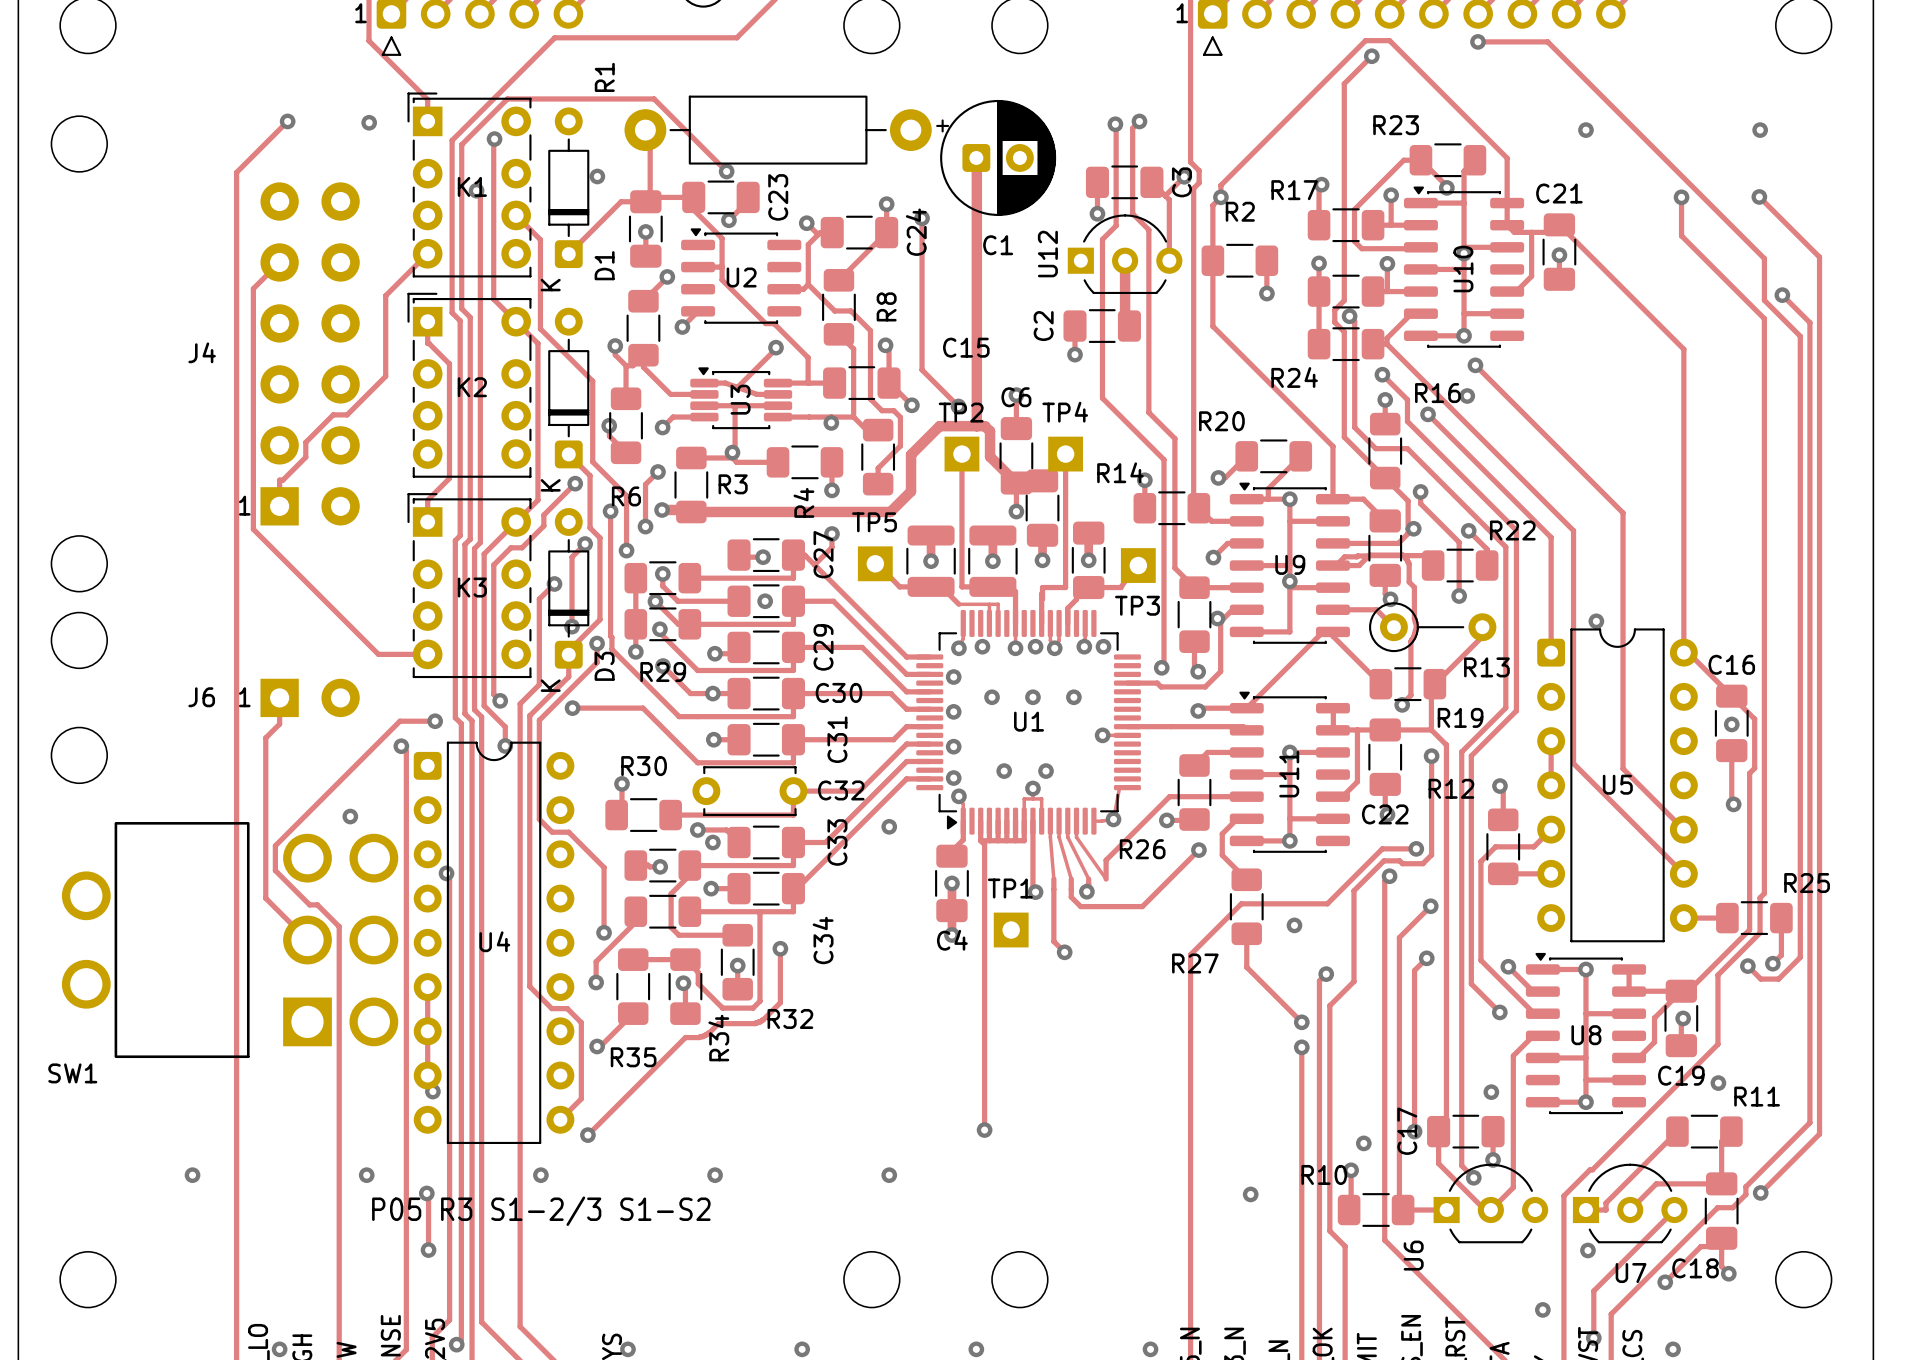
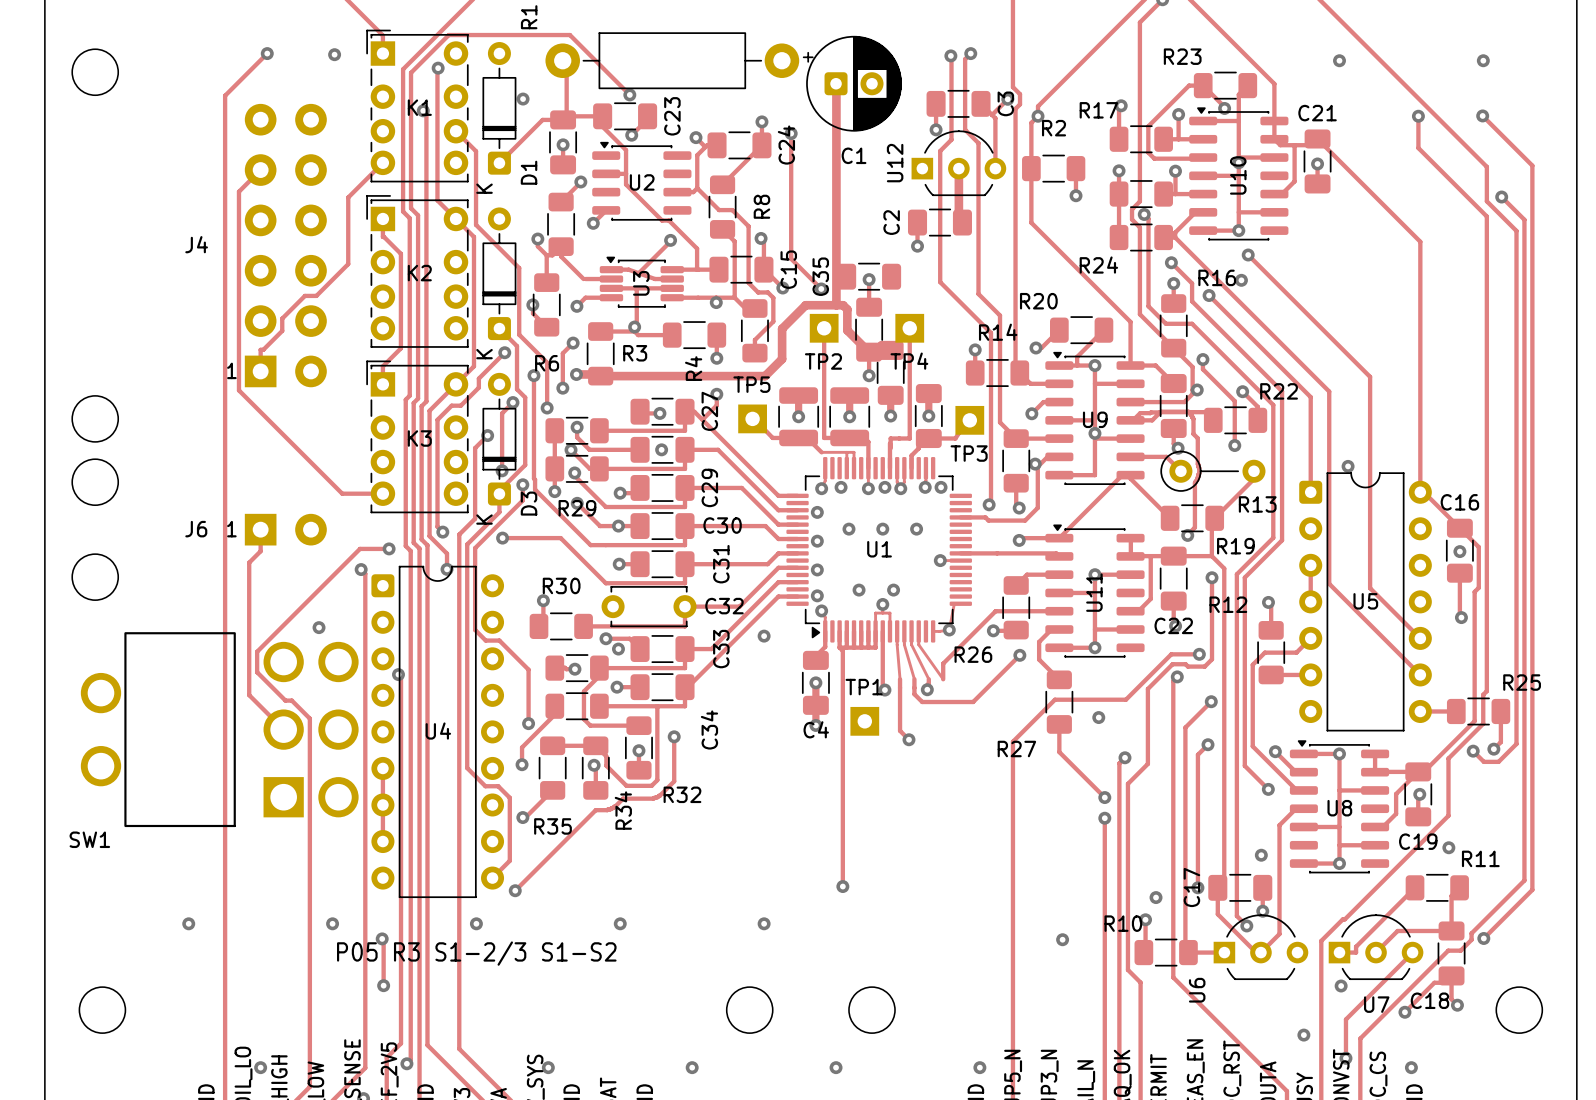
C15 name rotation: 0° (966, 347) -> 90° counterclockwise (788, 269)
C35: none -> (869, 276)
C6 name: C6 (1016, 397) -> none
TP2 name position: TP2 (961, 412) -> TP2 (823, 361)
TP4 name position: TP4 (1065, 412) -> TP4 (909, 361)
R14 name position: R14 (1120, 472) -> R14 (998, 332)
via: (432, 1091) -> none

